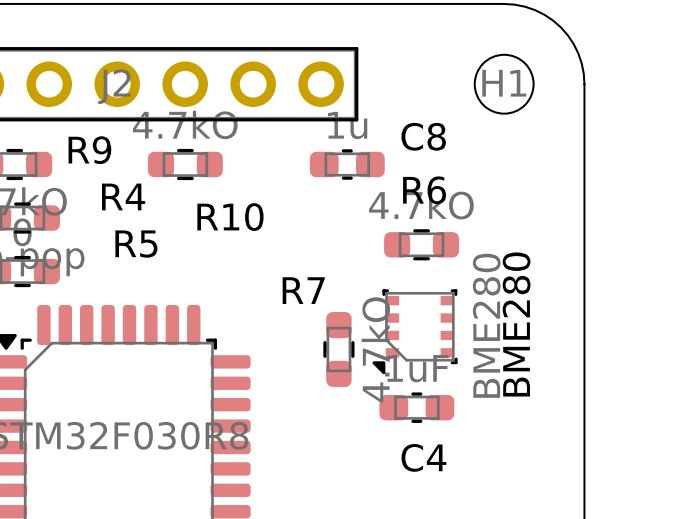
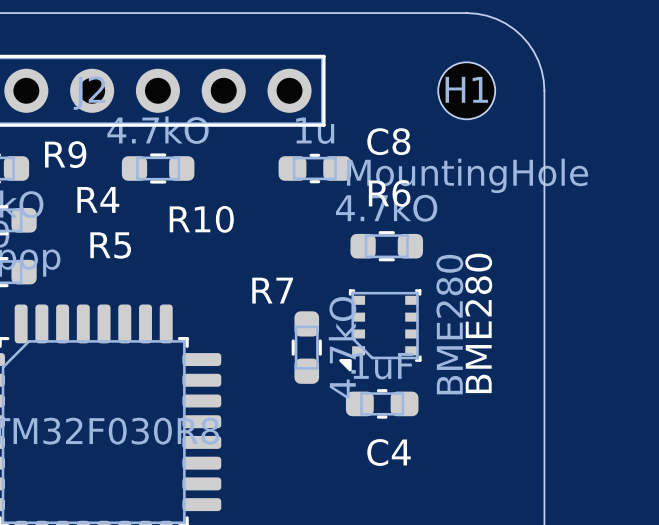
H1 value: none -> MountingHole (467, 175)

